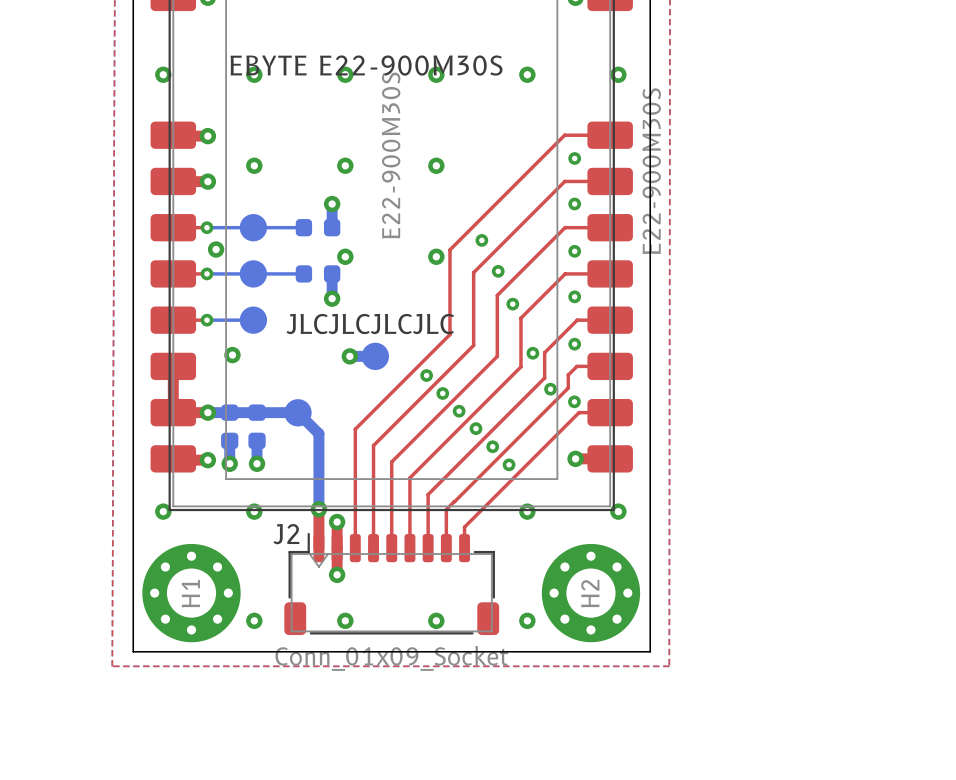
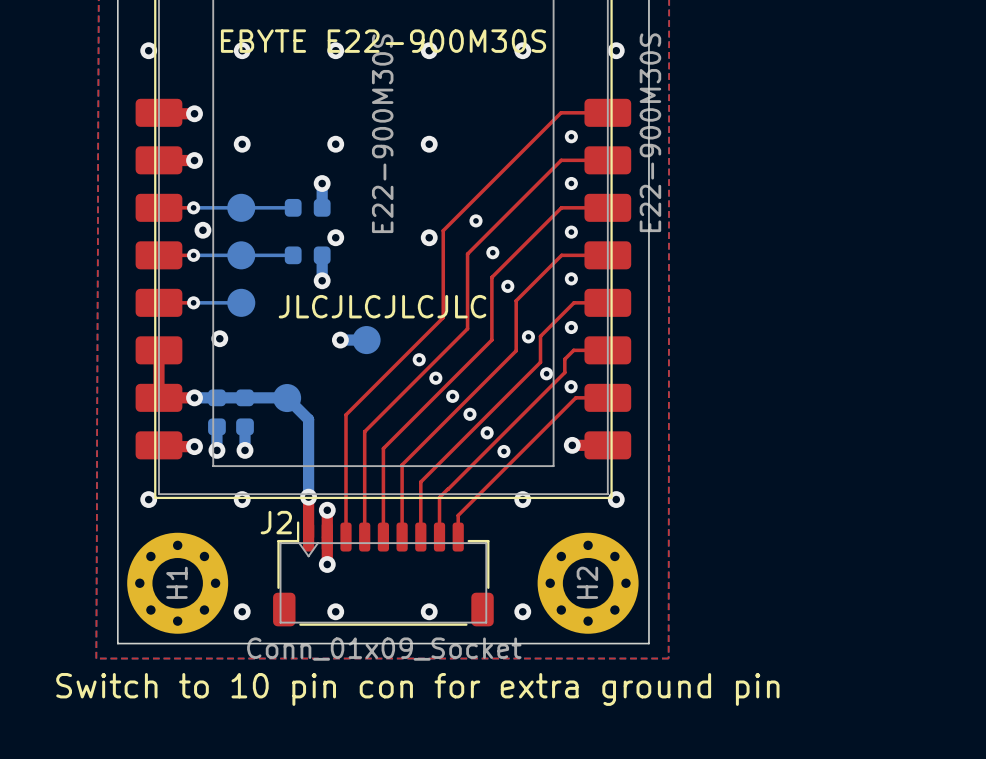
text: none -> Switch to 10 pin con for extra ground pin (417, 689)

